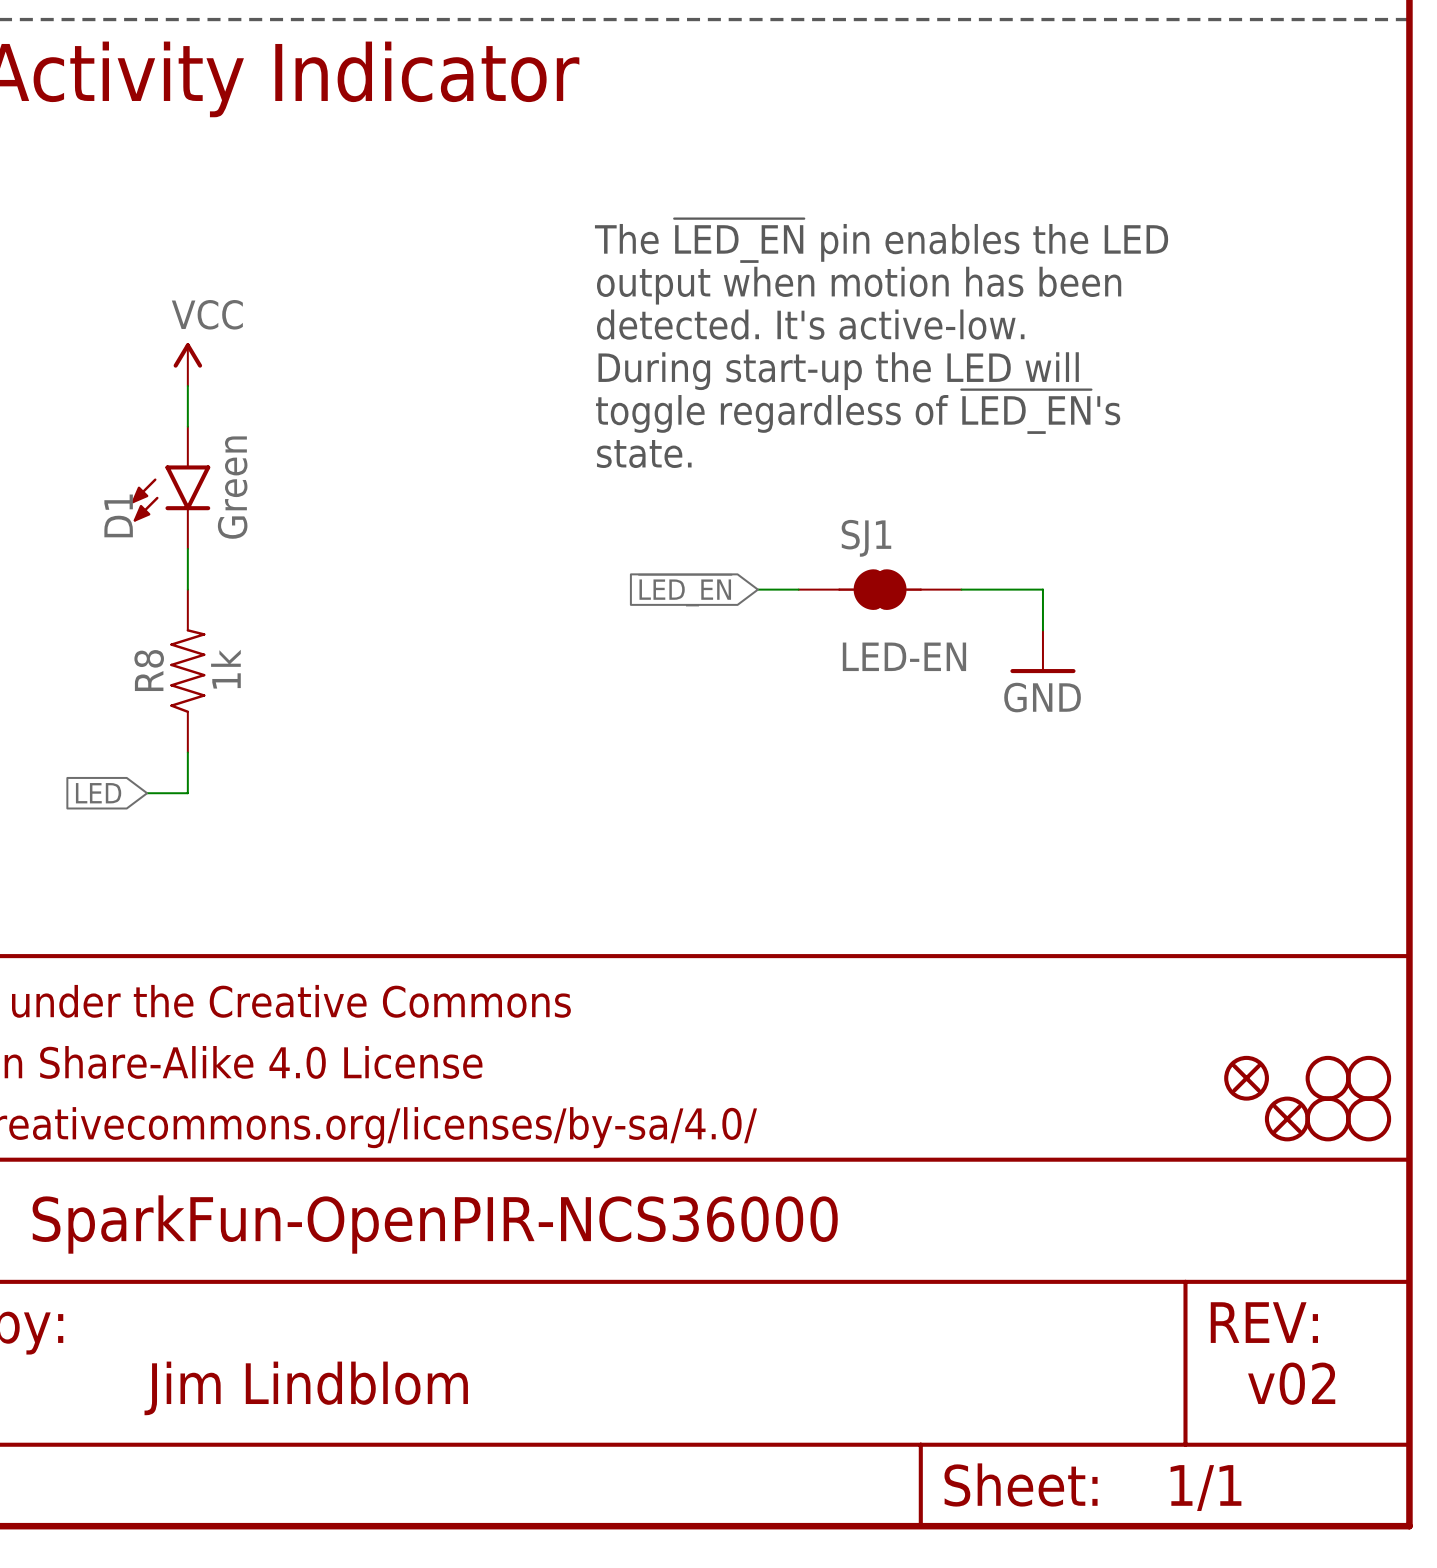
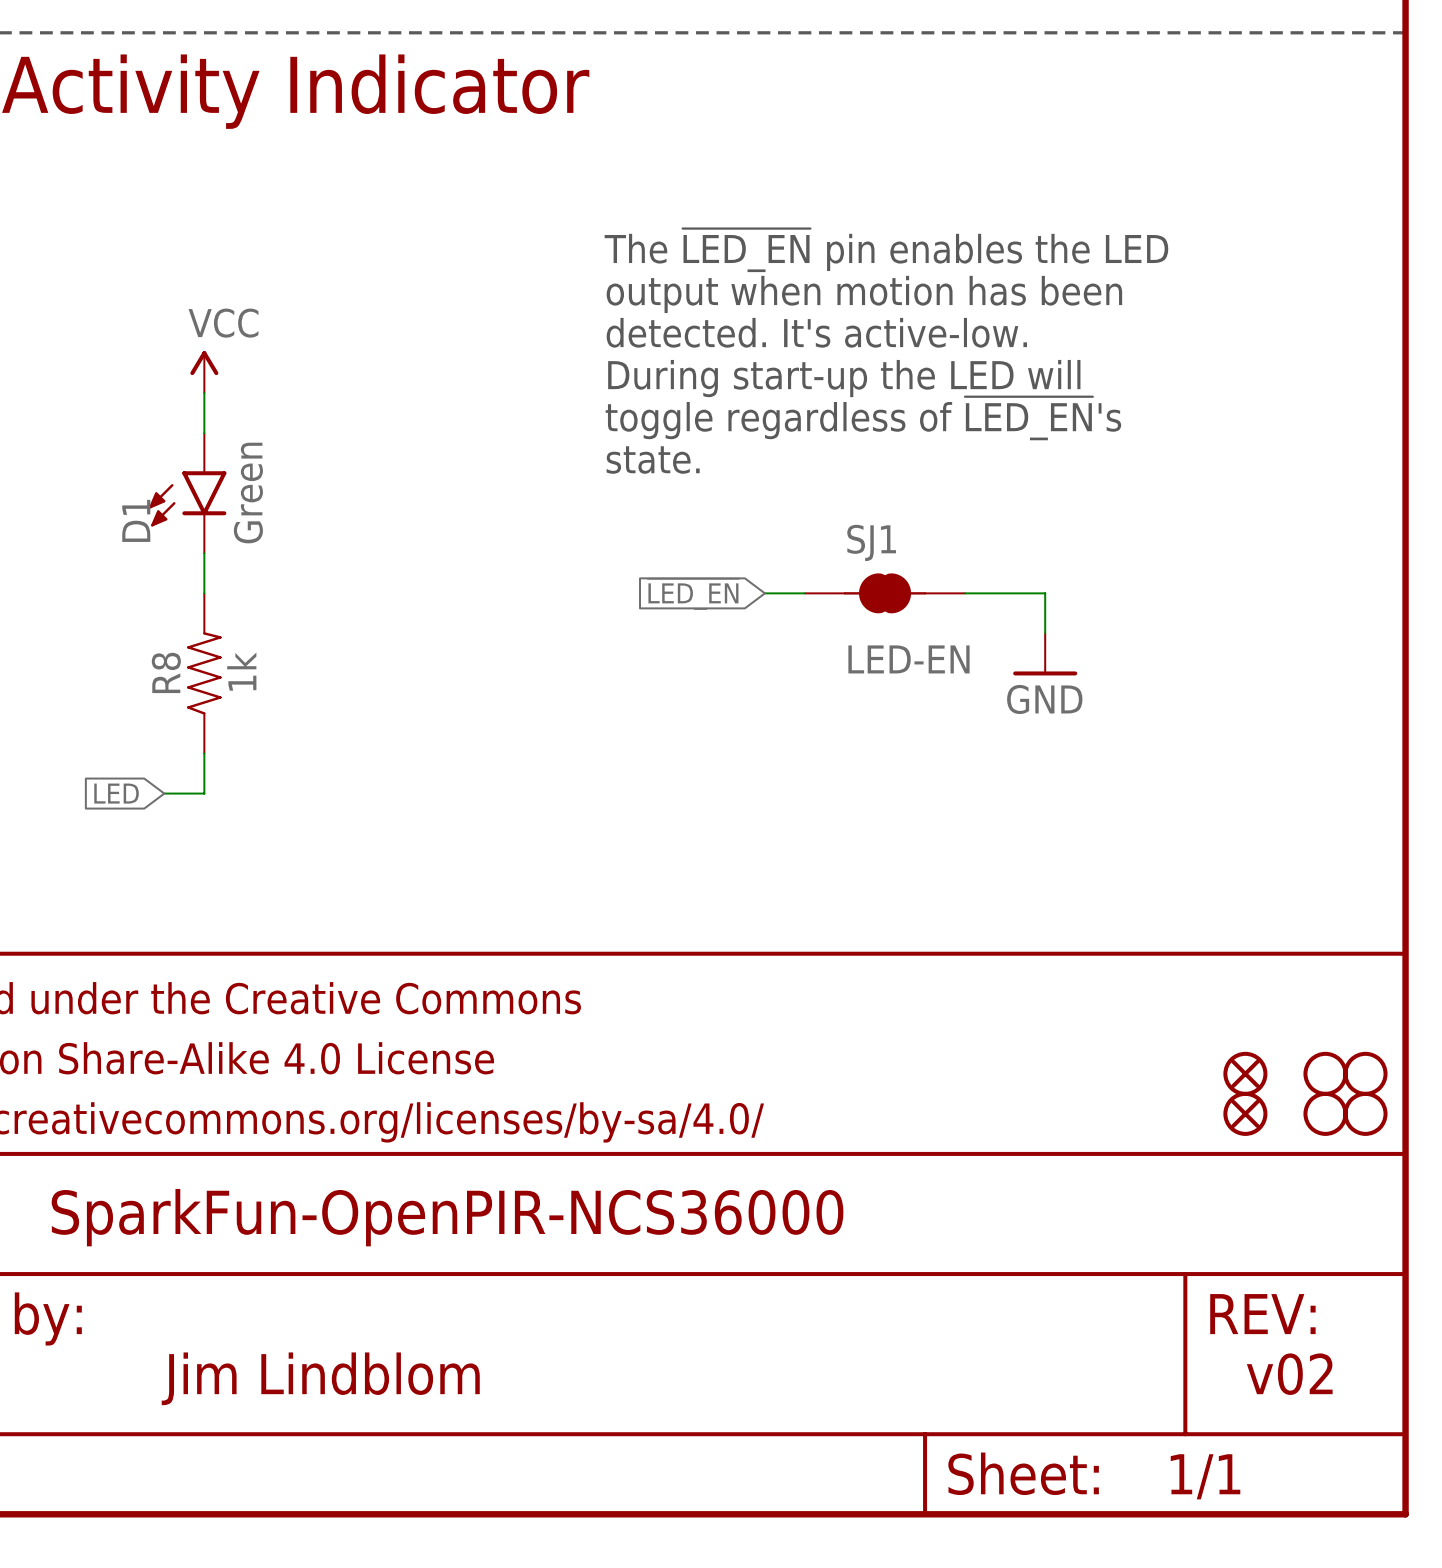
part position: (1287, 1118) -> (1245, 1113)

